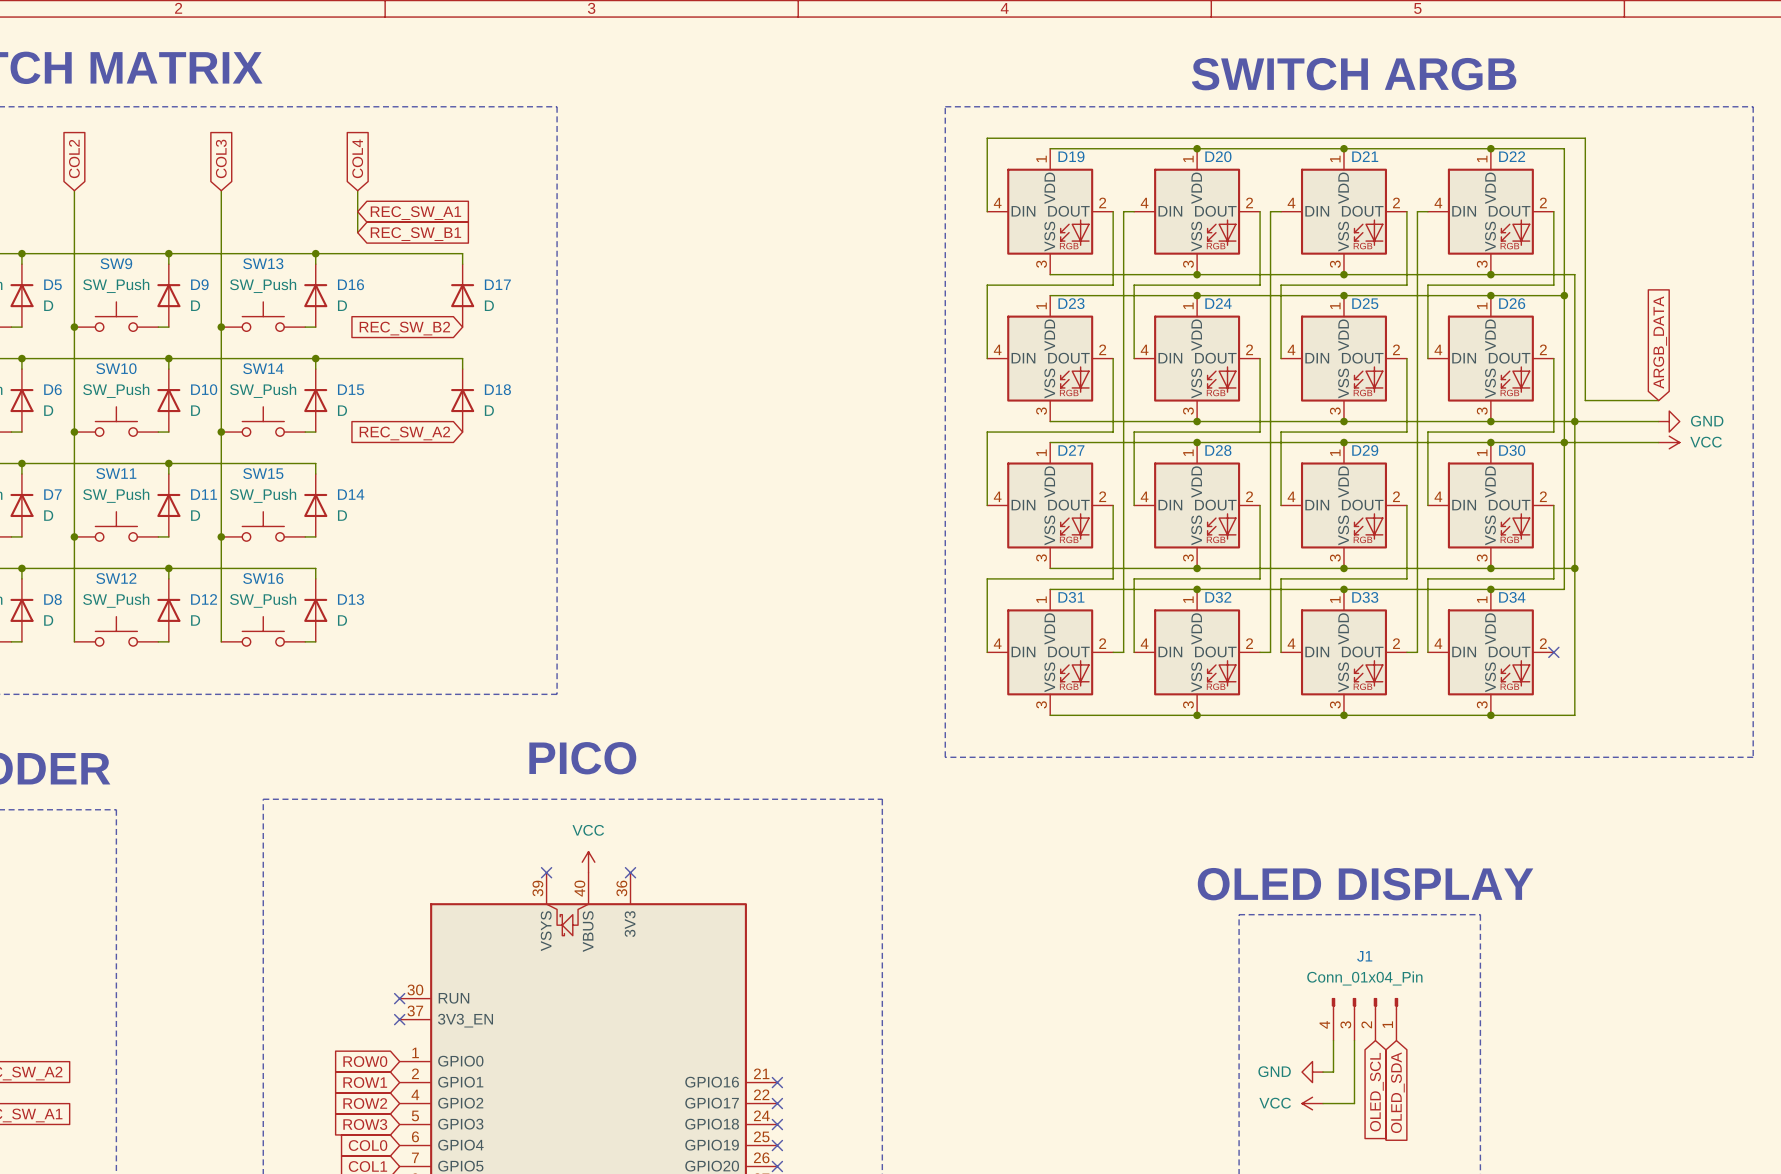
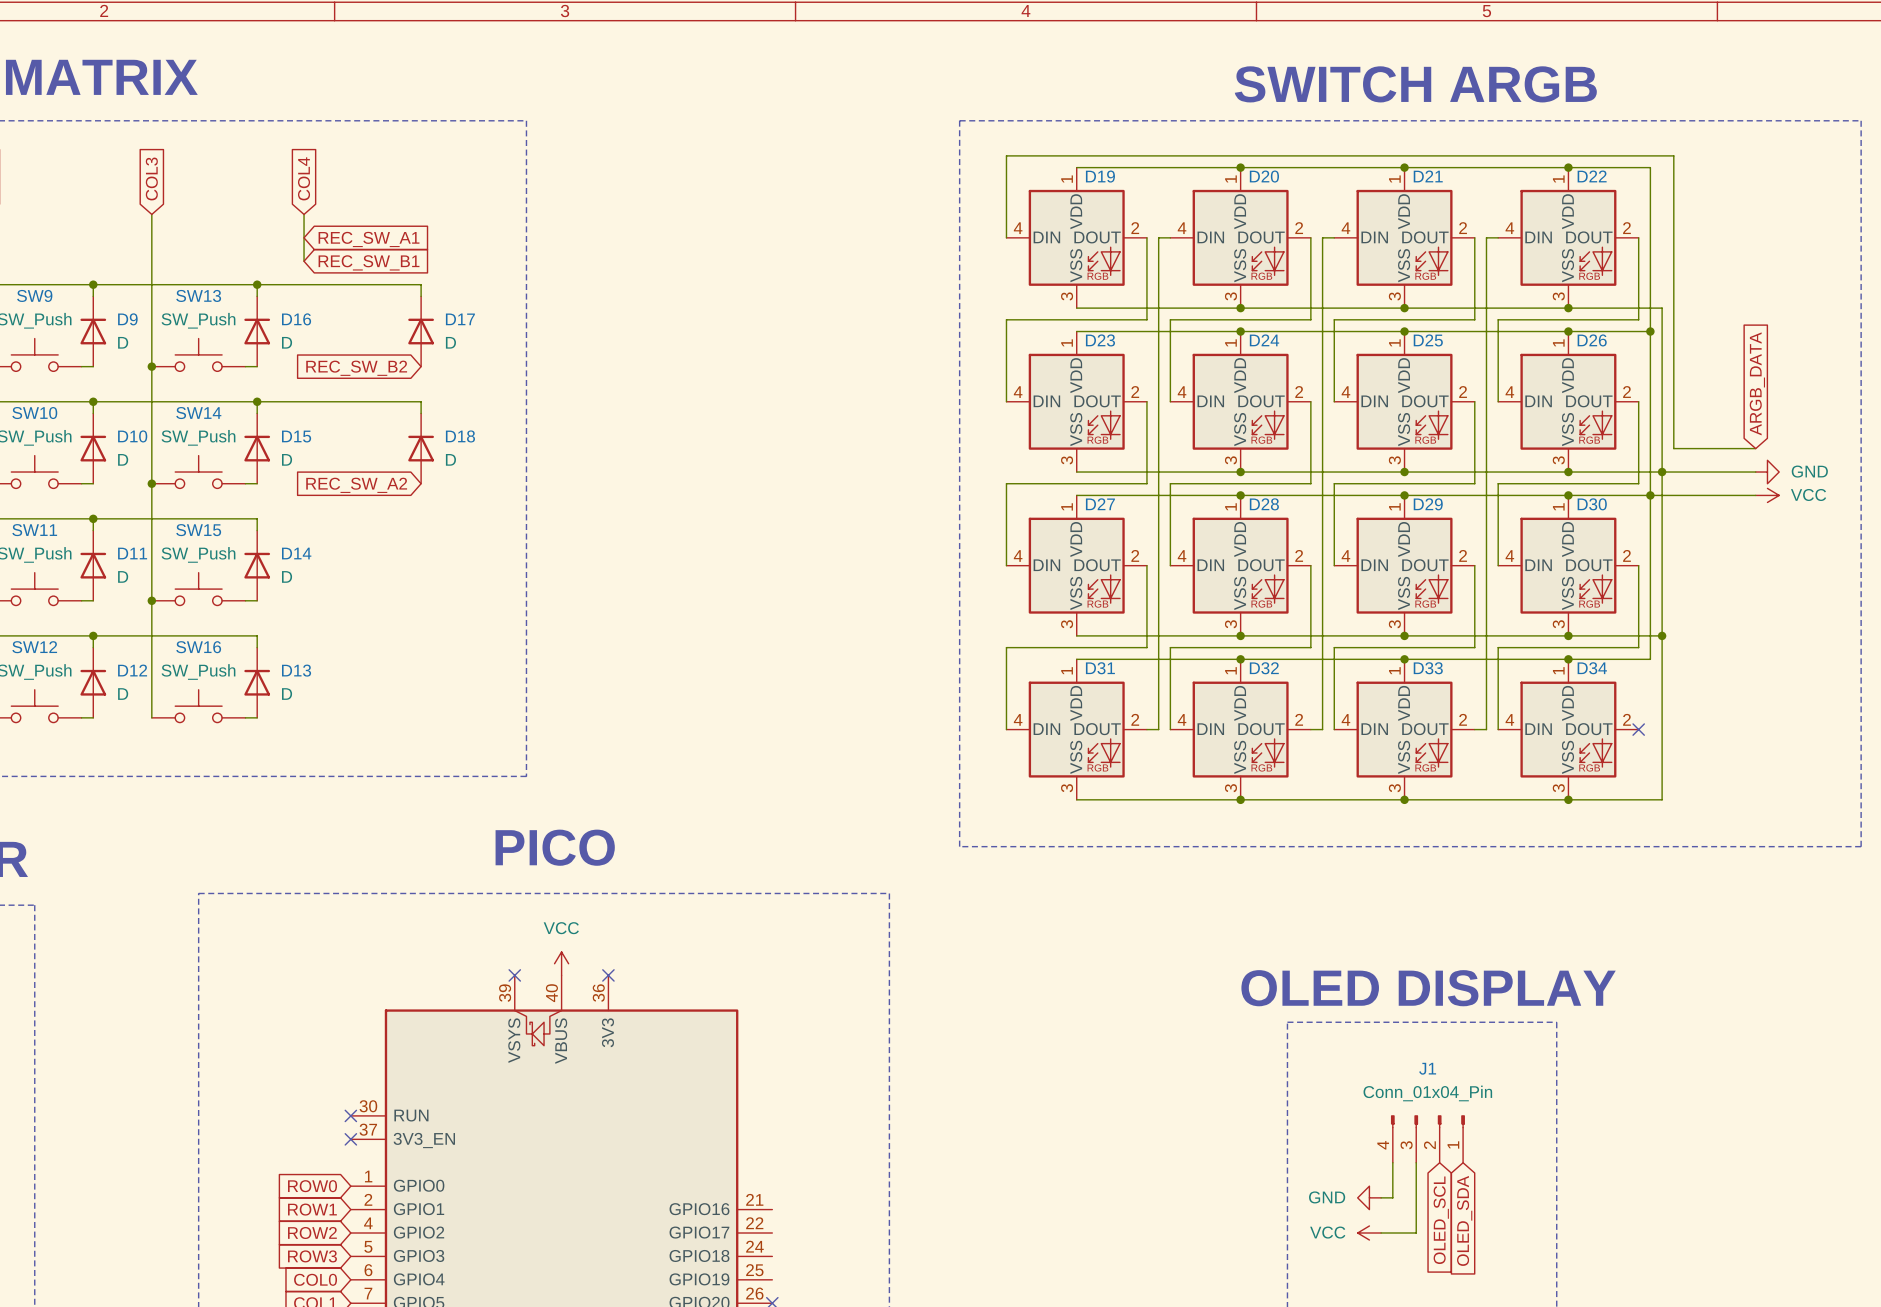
no-connect mark: (777, 1082) -> none
no-connect mark: (777, 1103) -> none
no-connect mark: (777, 1124) -> none
no-connect mark: (777, 1145) -> none

